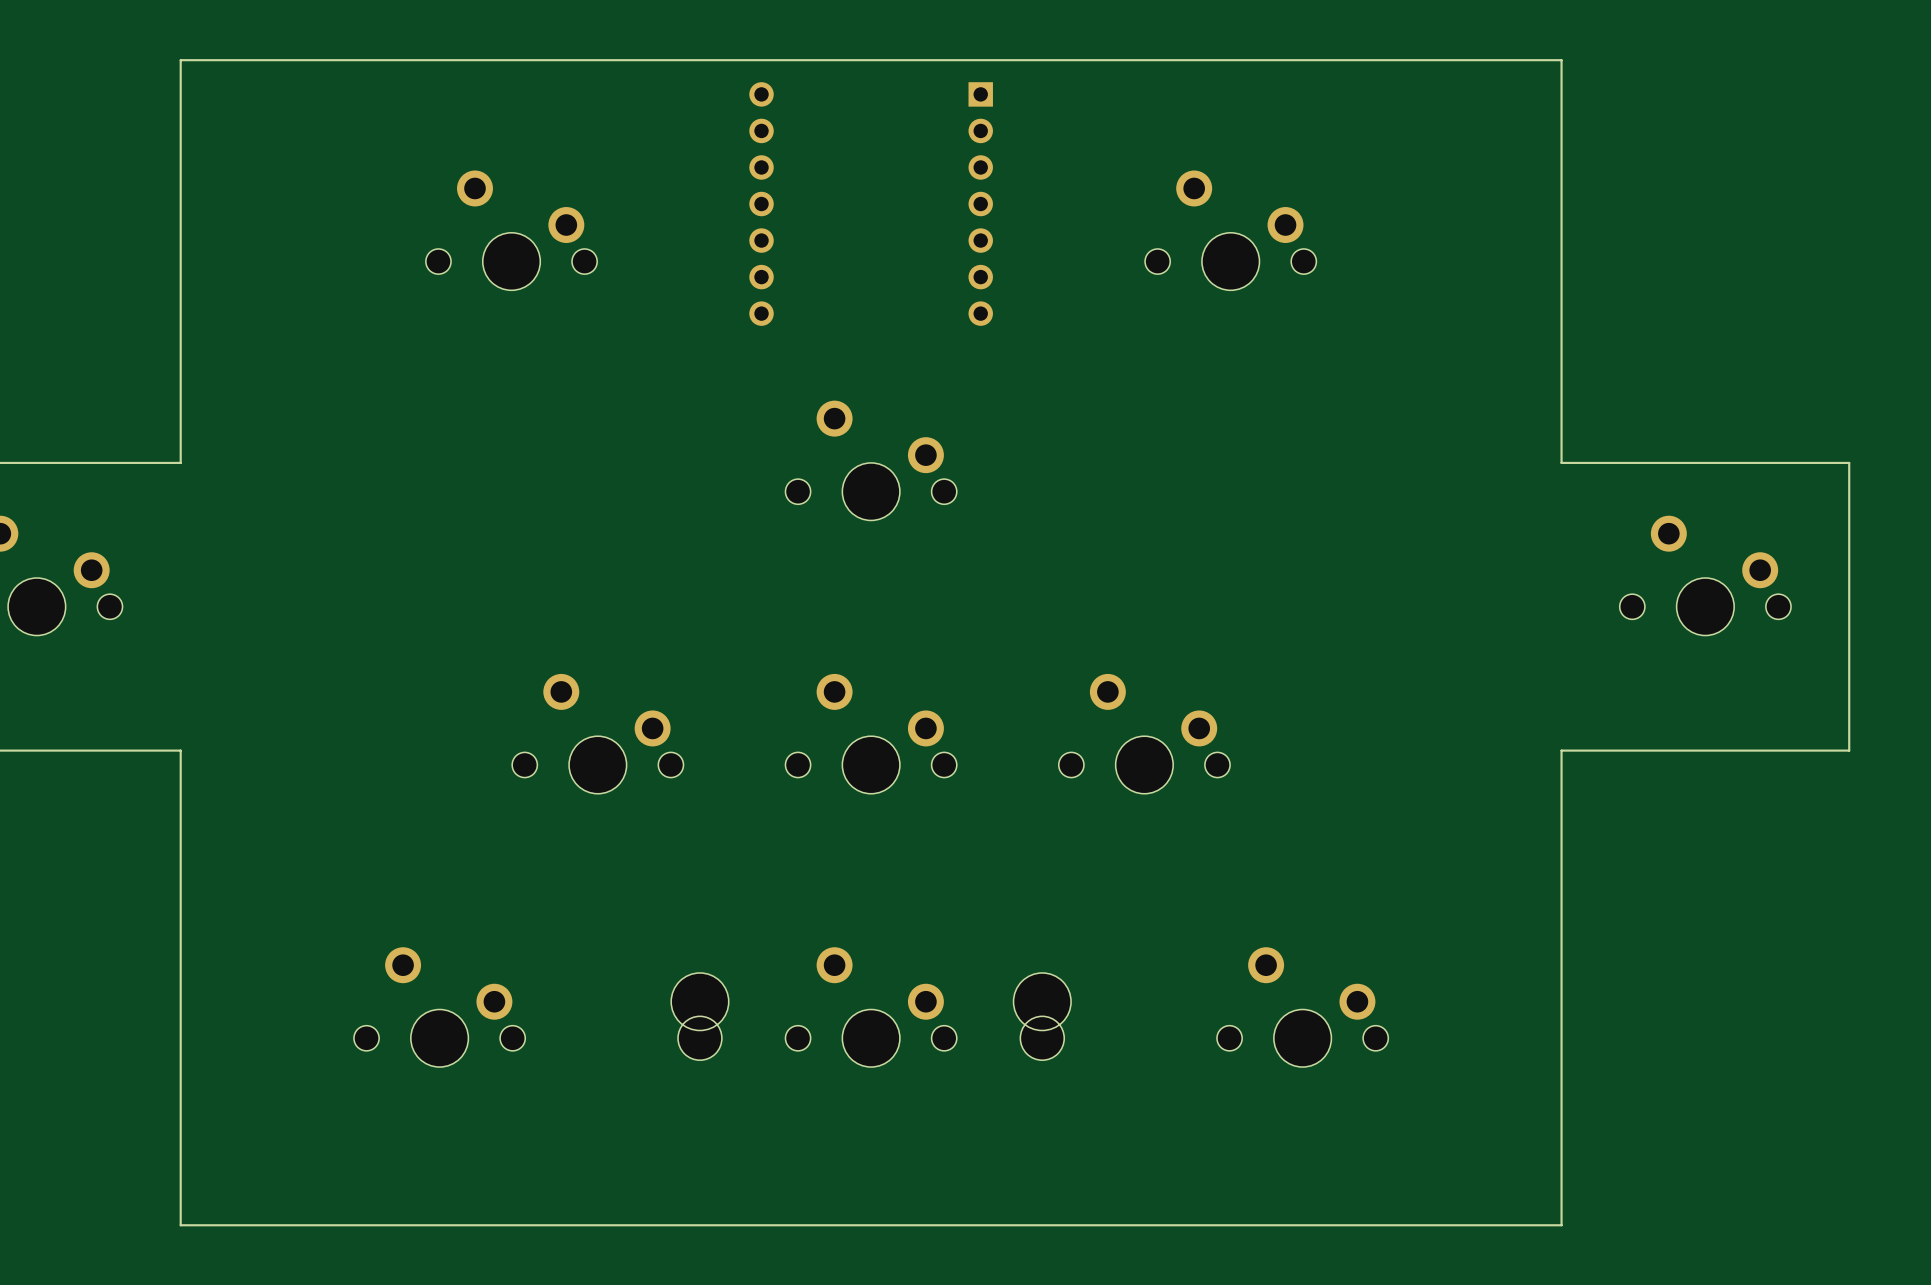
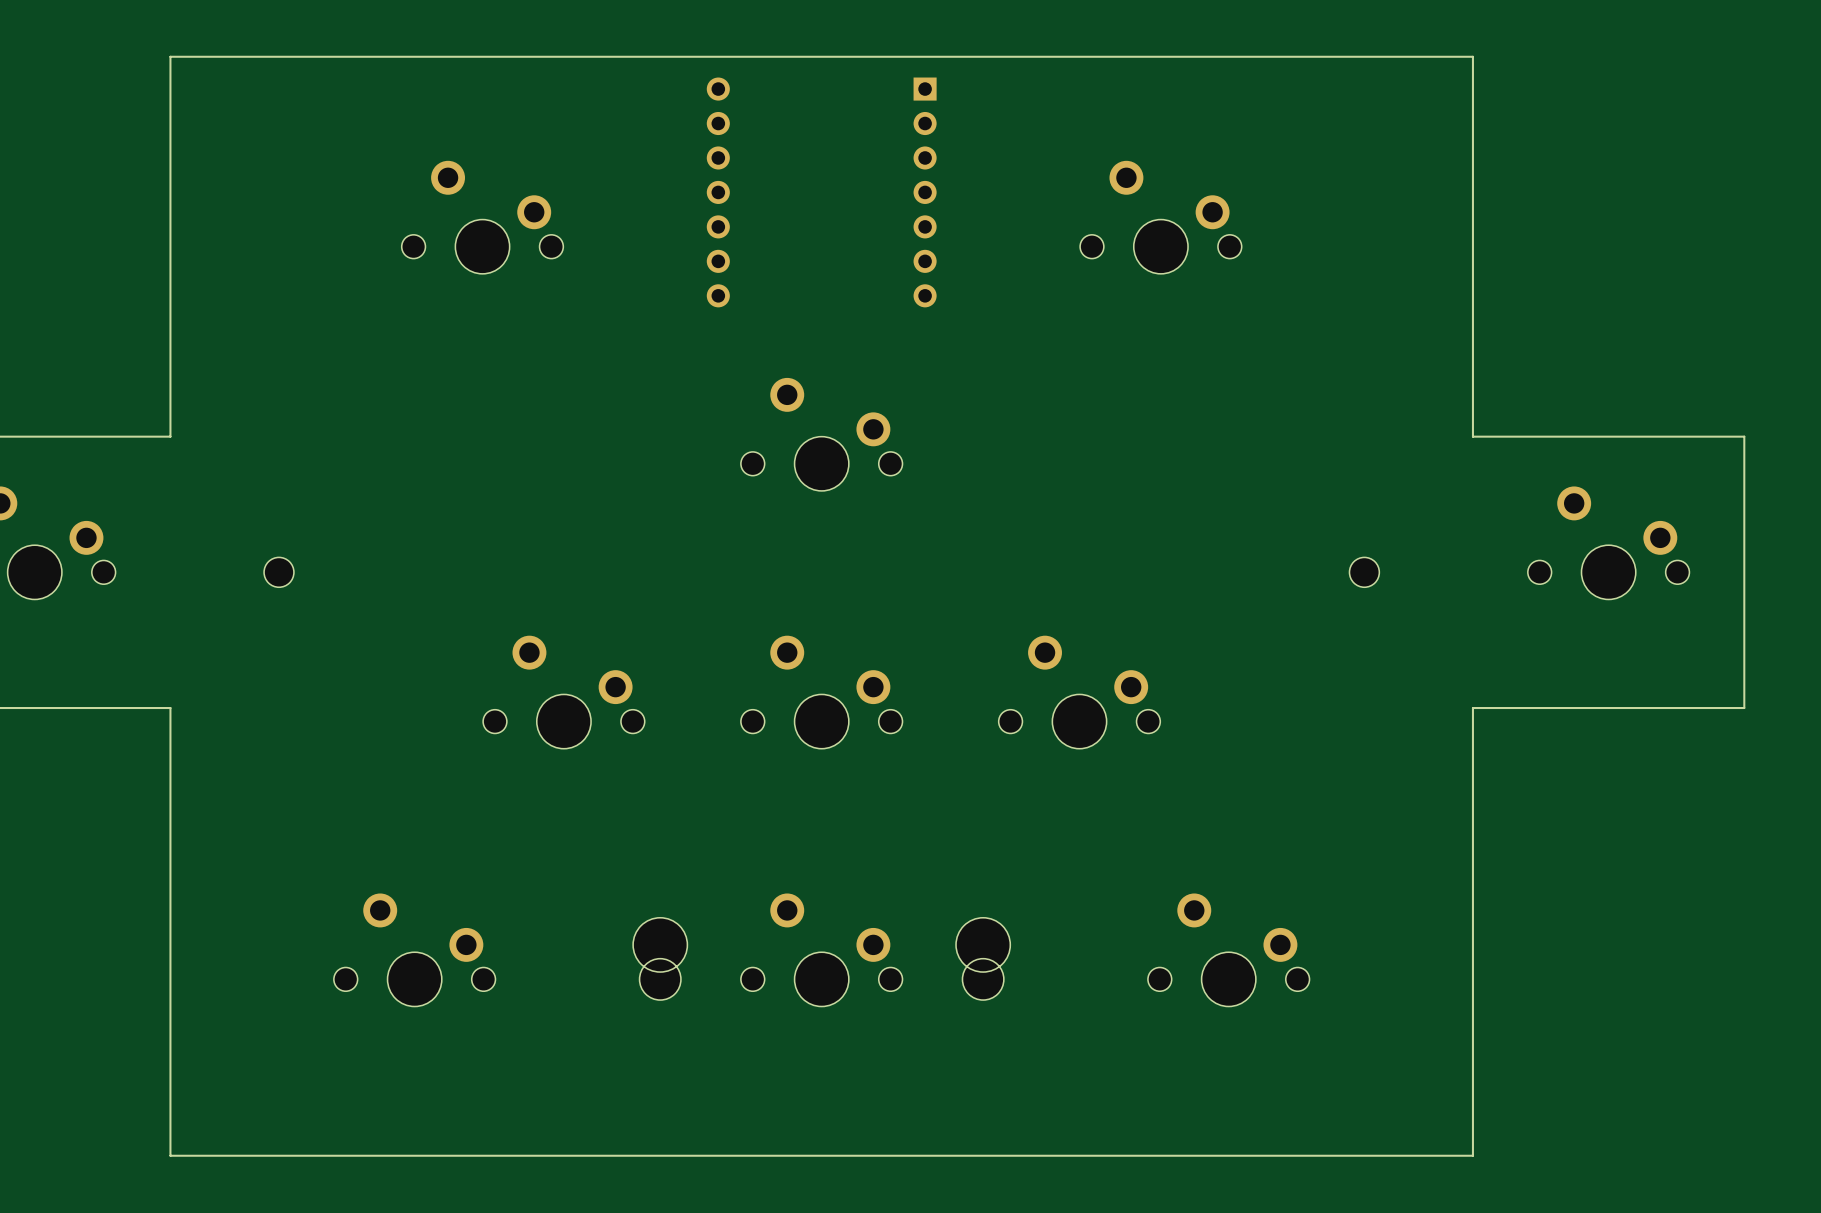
part: none -> (278, 572)
part: none -> (1364, 572)

